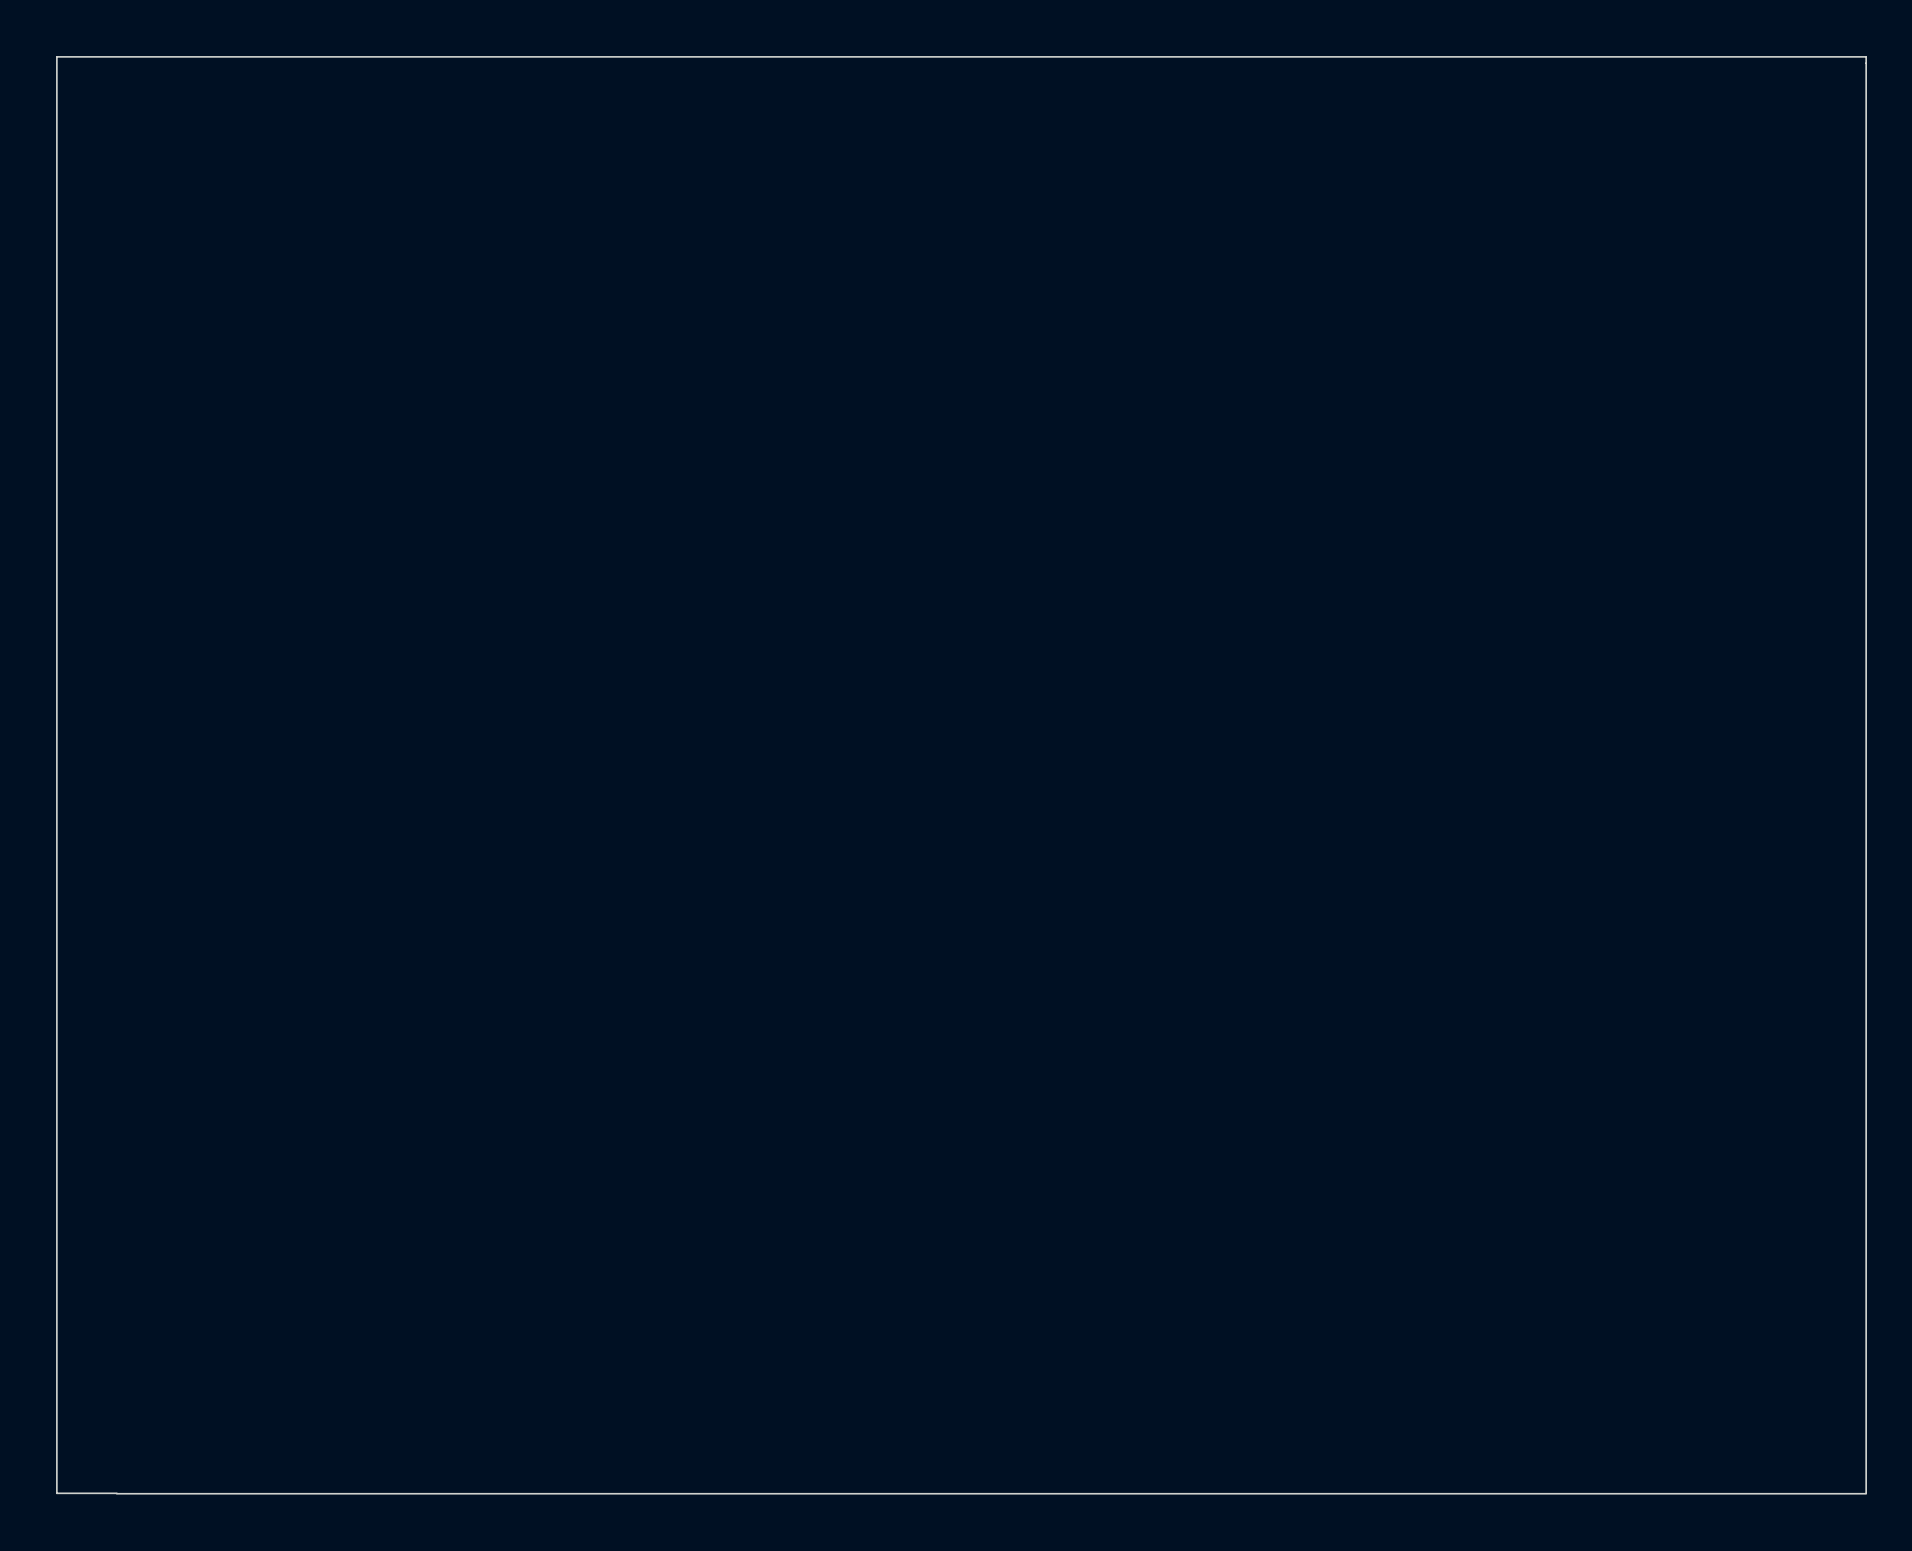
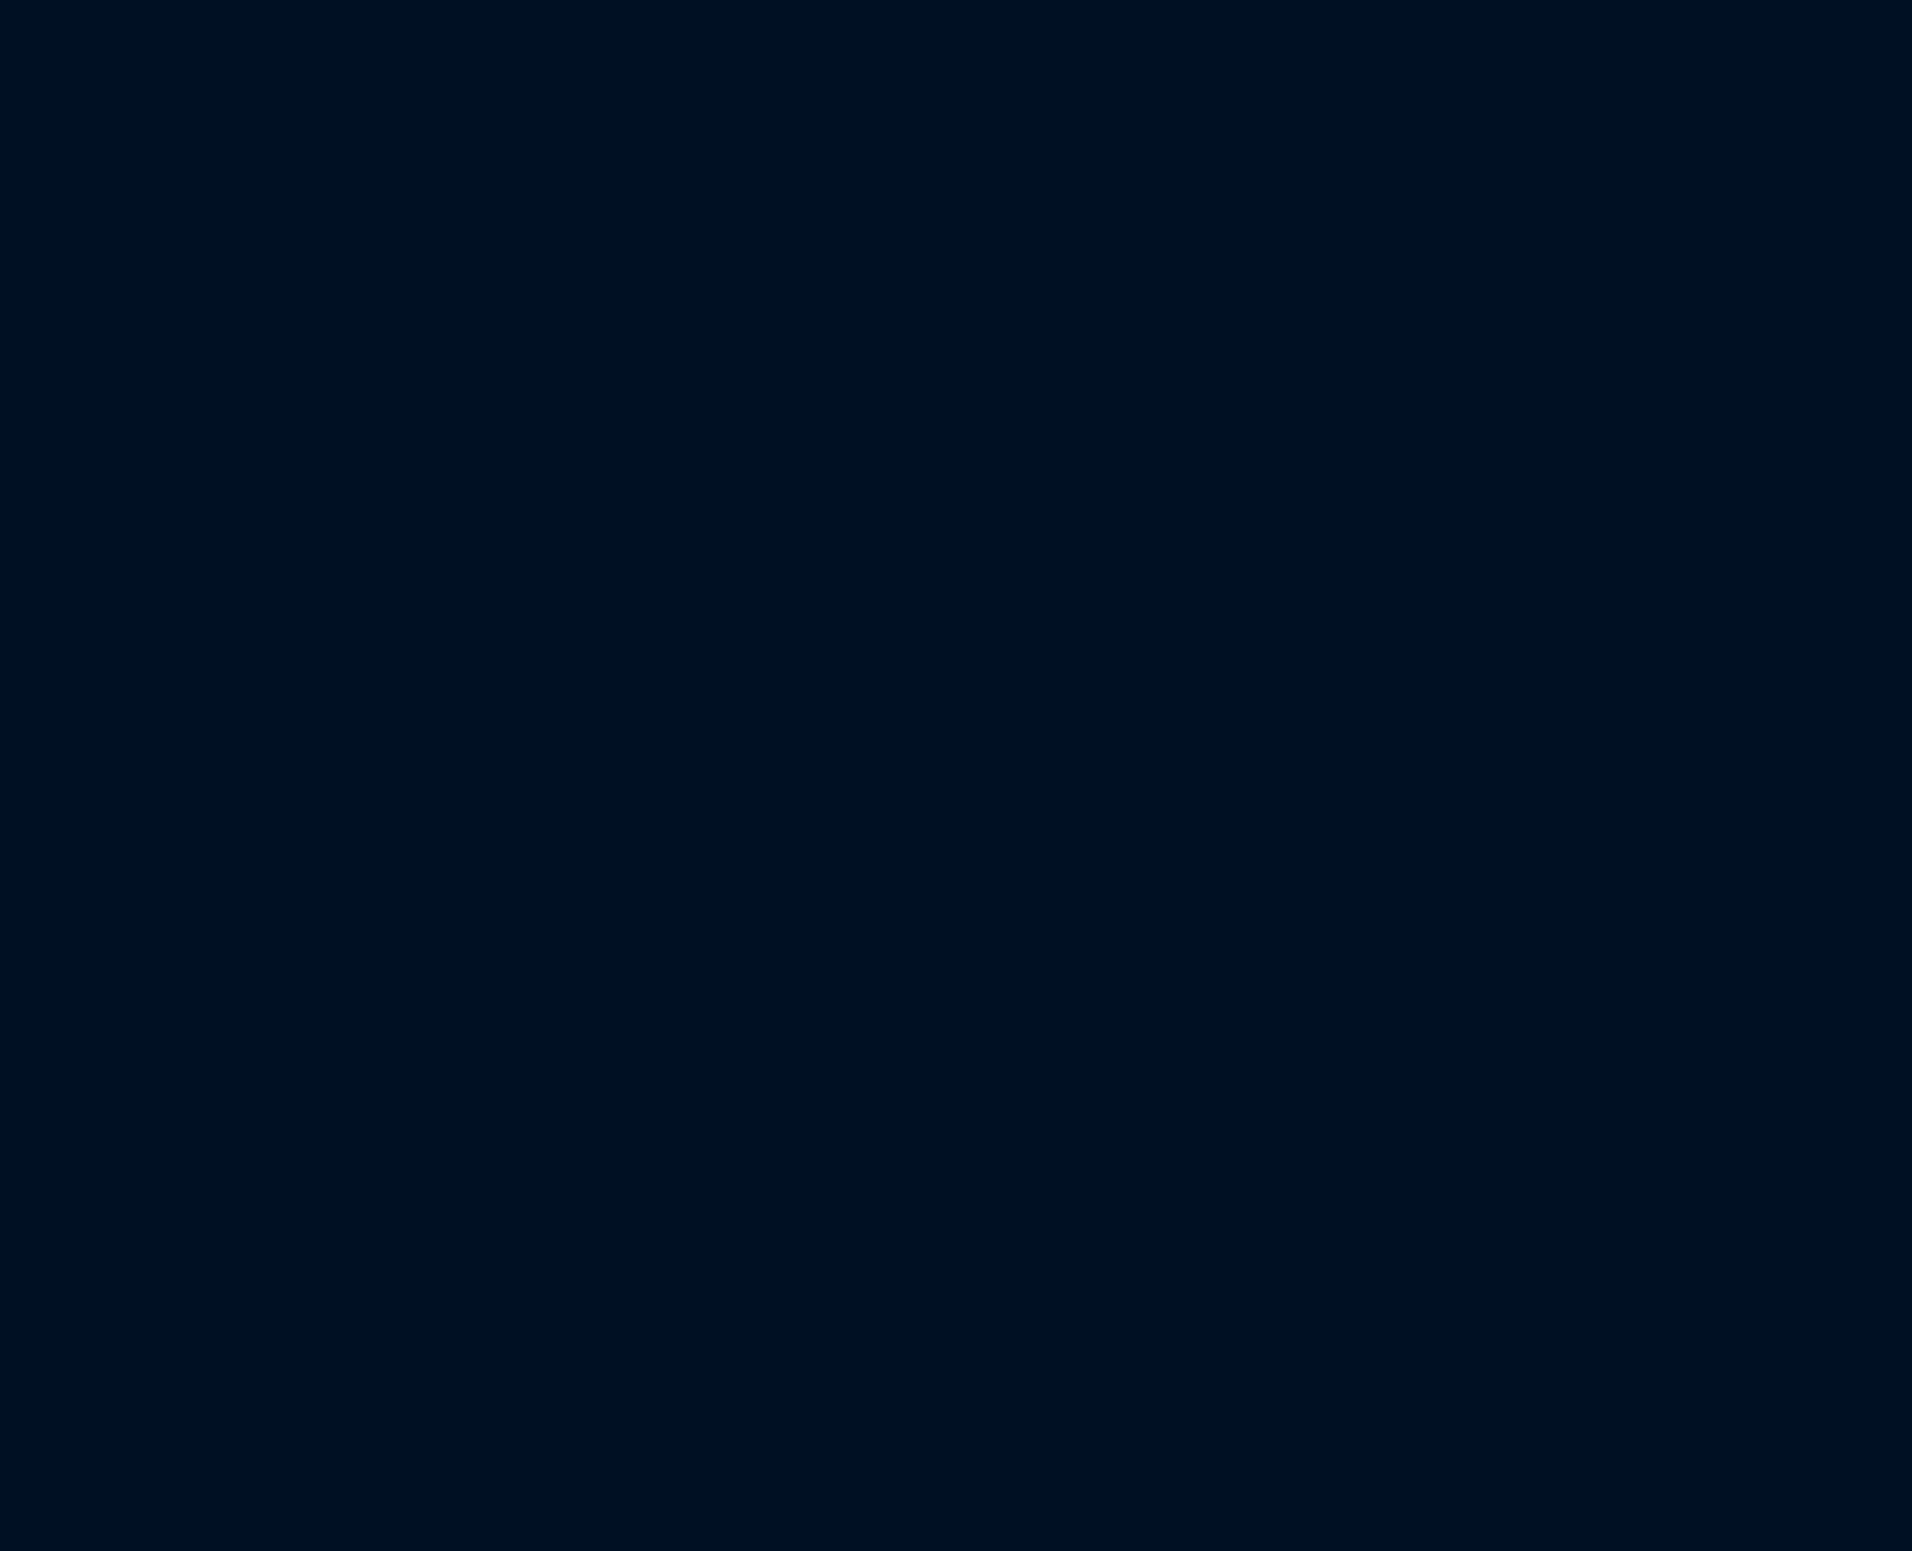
board edge: (116, 1493) (56, 1493) (56, 56) (1866, 56) (1866, 1493) -> none
board edge: (116, 1493) (1866, 1493) -> none

